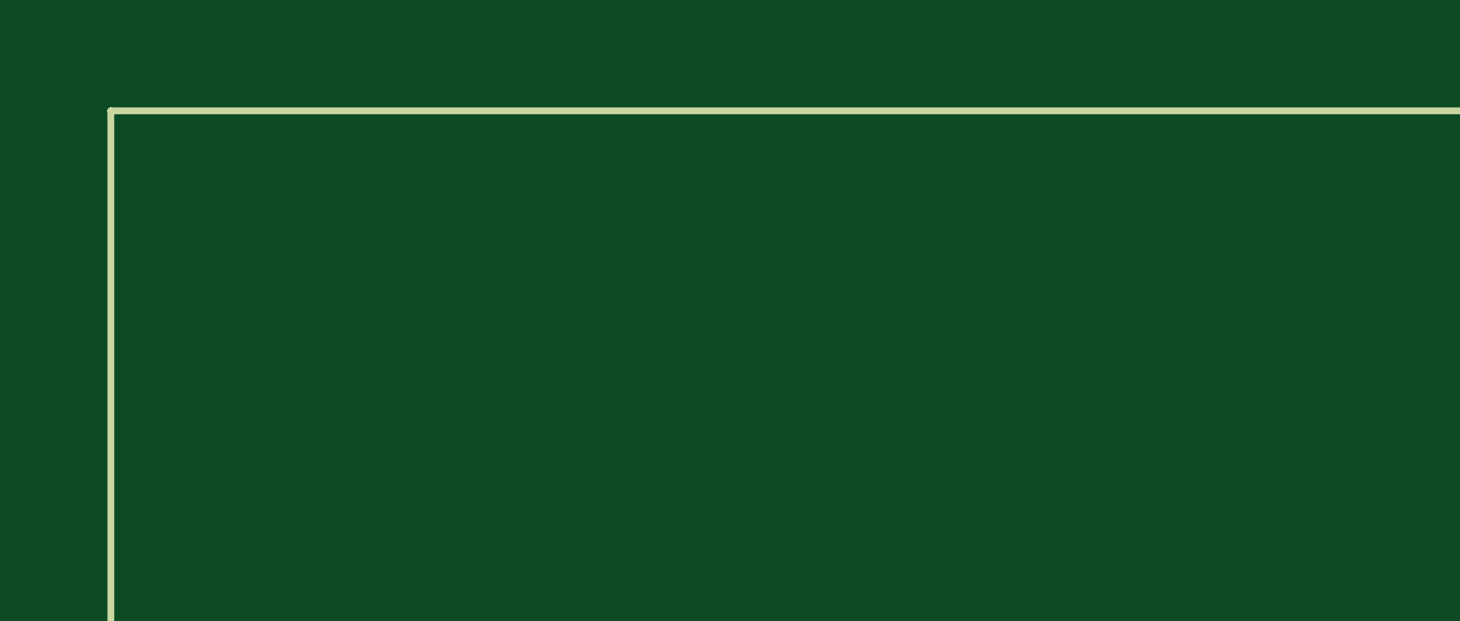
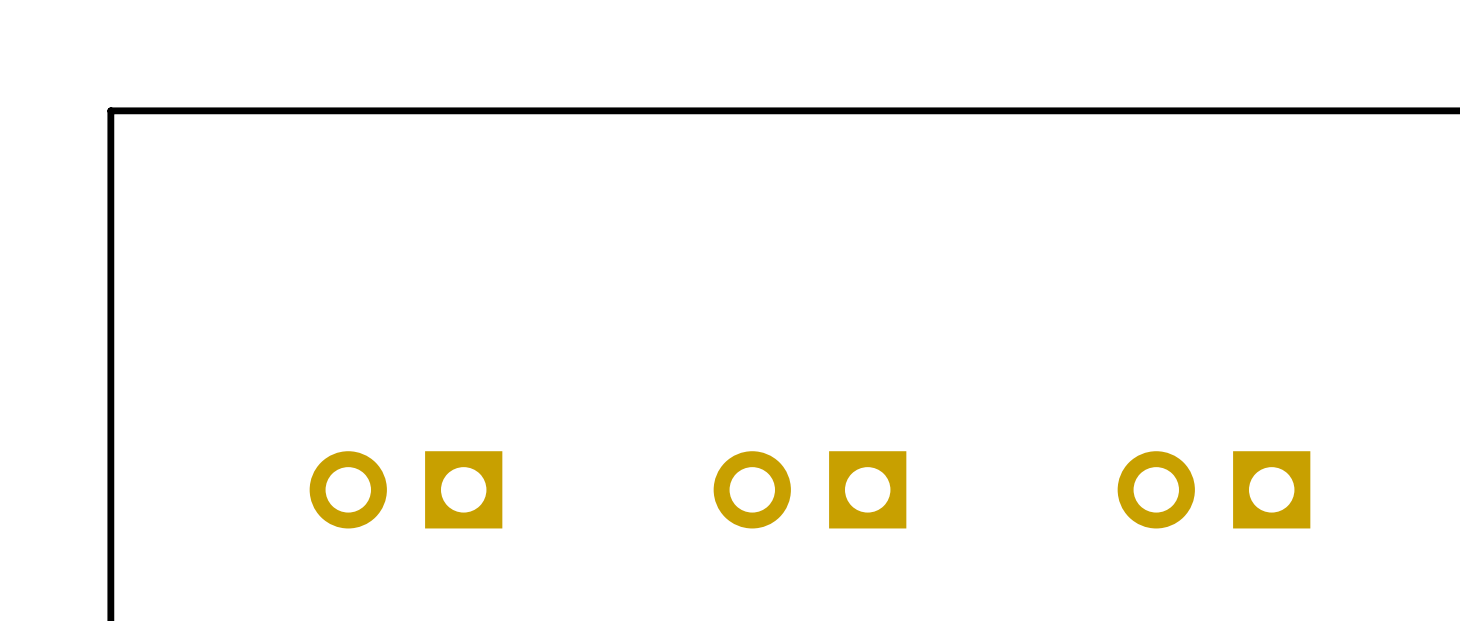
part: none -> (406, 489)
part: none -> (810, 489)
part: none -> (1214, 489)

